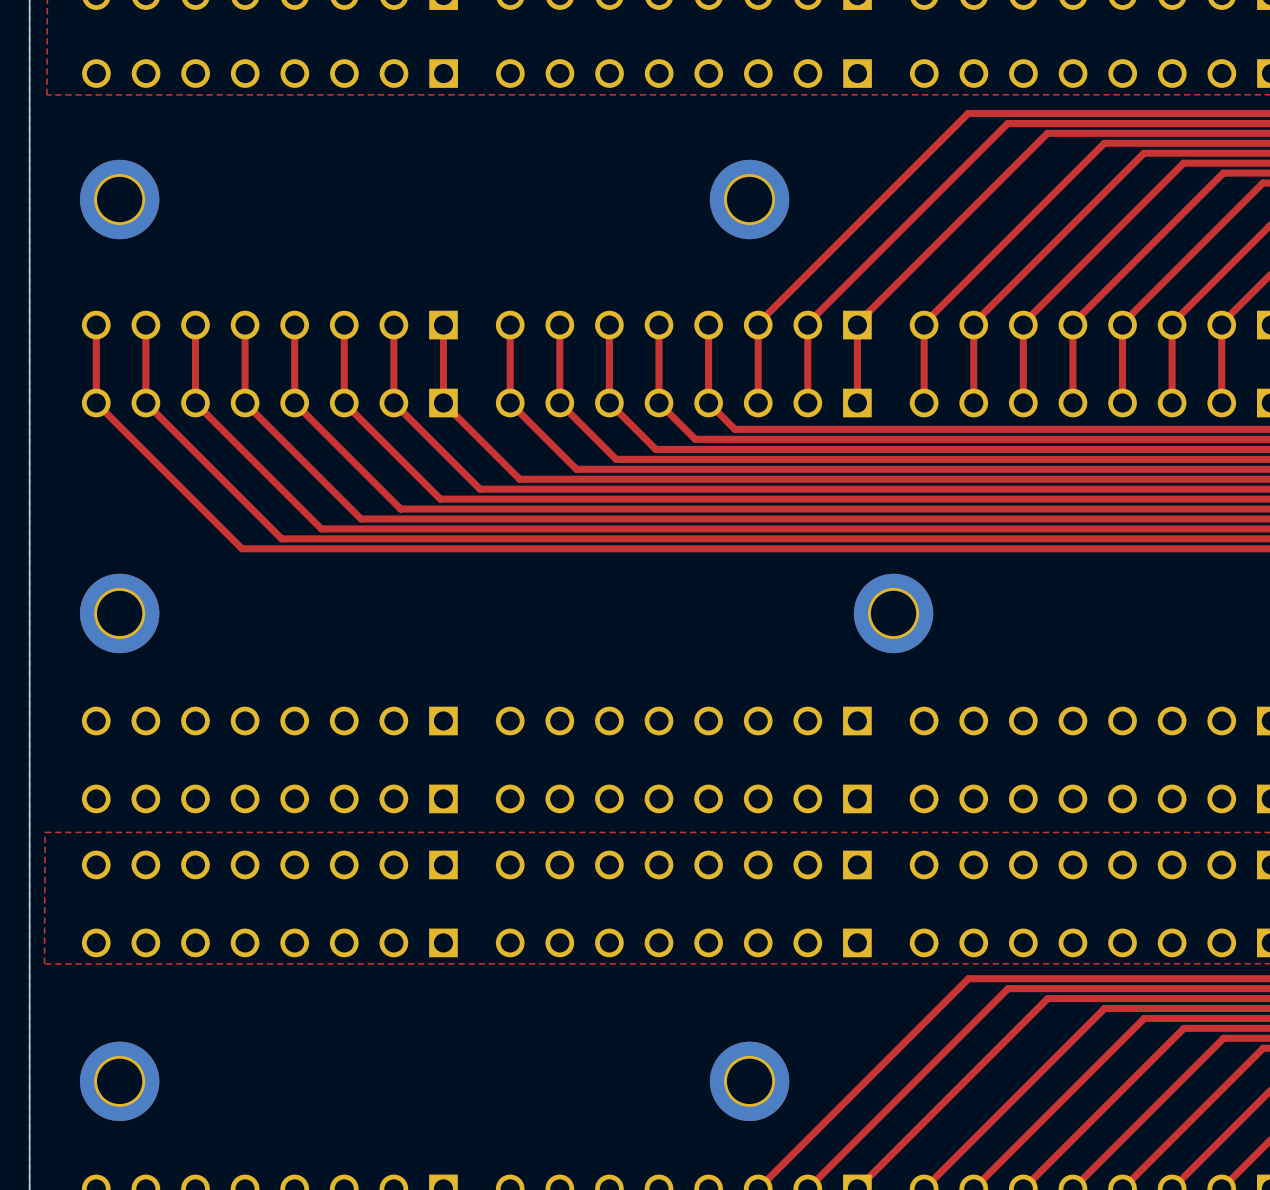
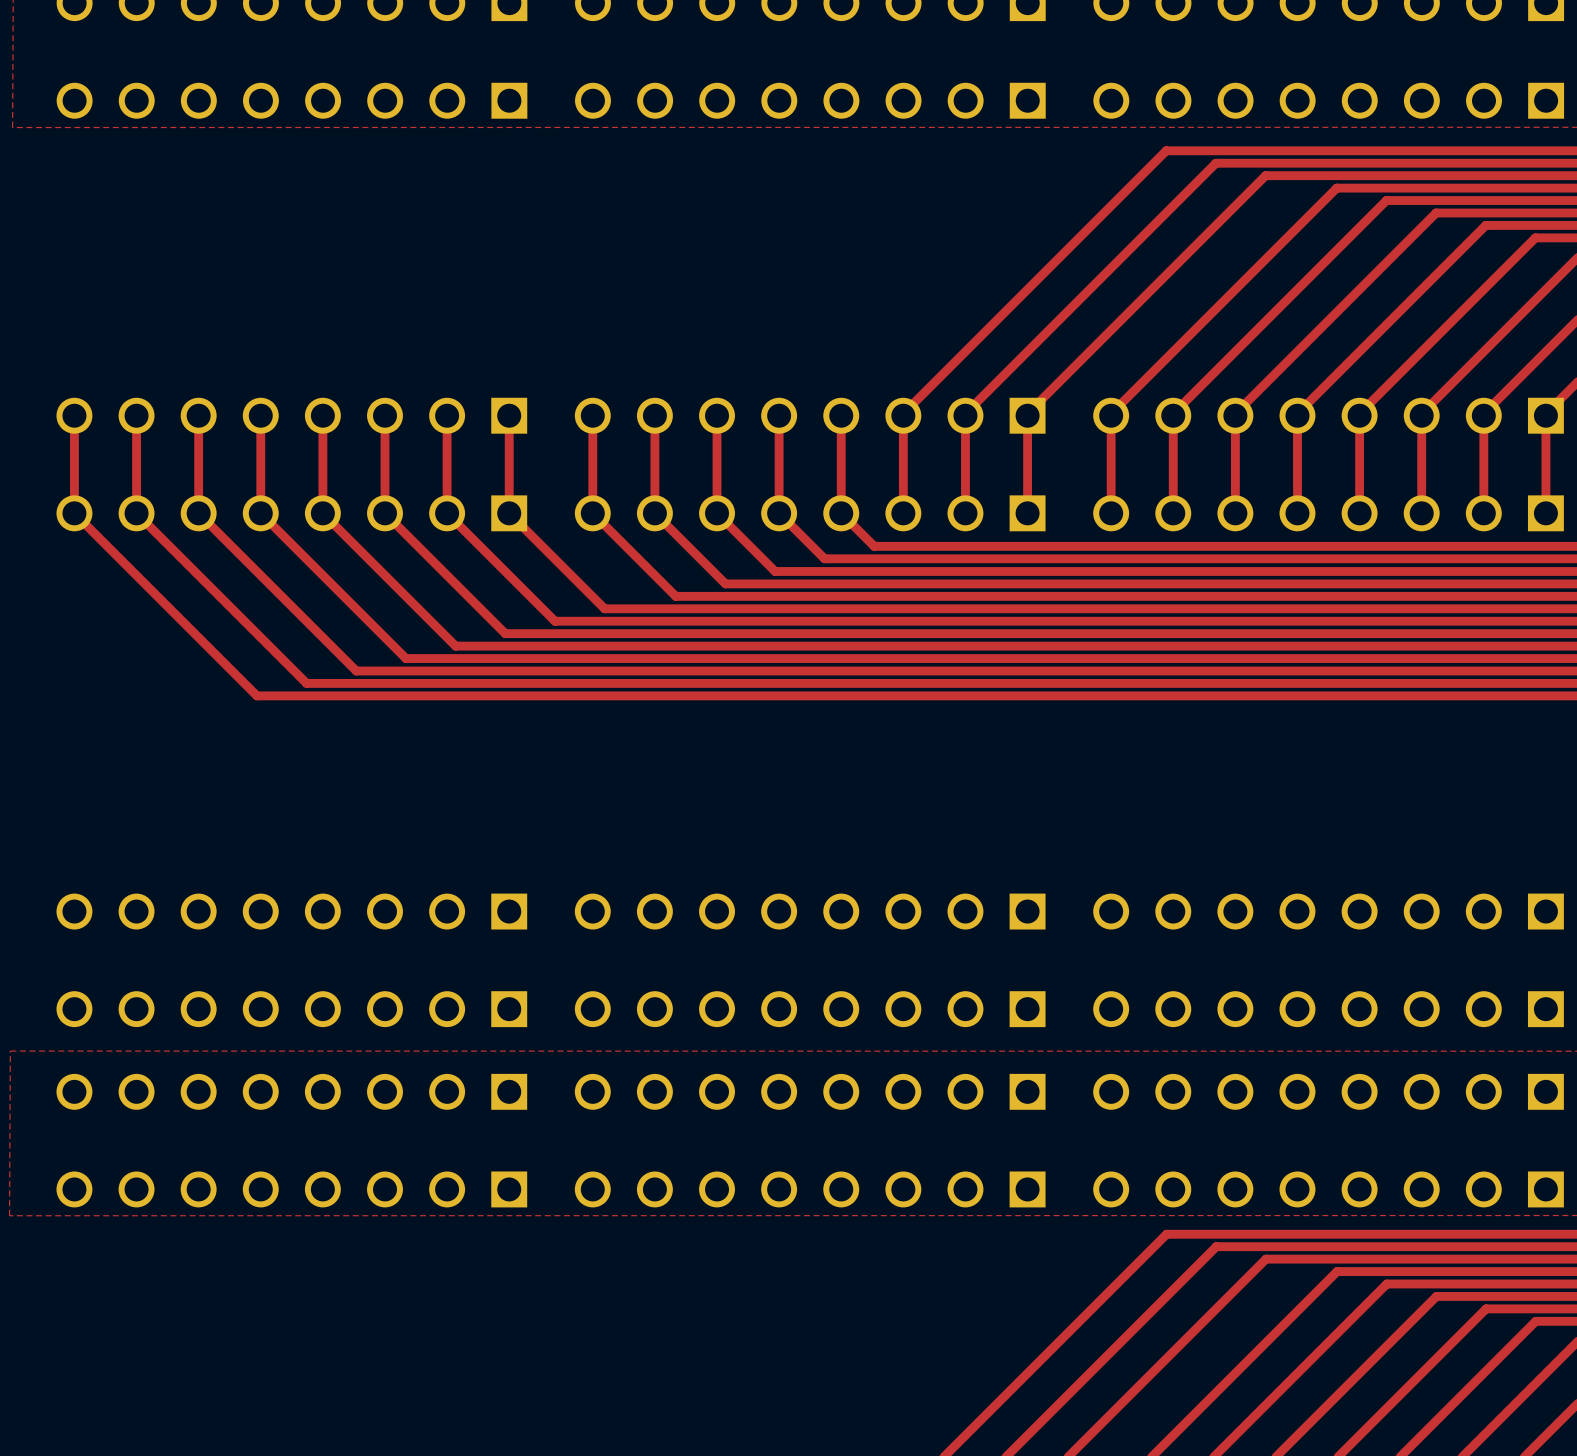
part: (119, 199) -> none
part: (749, 199) -> none
part: (119, 613) -> none
part: (893, 613) -> none
part: (119, 1081) -> none
part: (749, 1081) -> none

